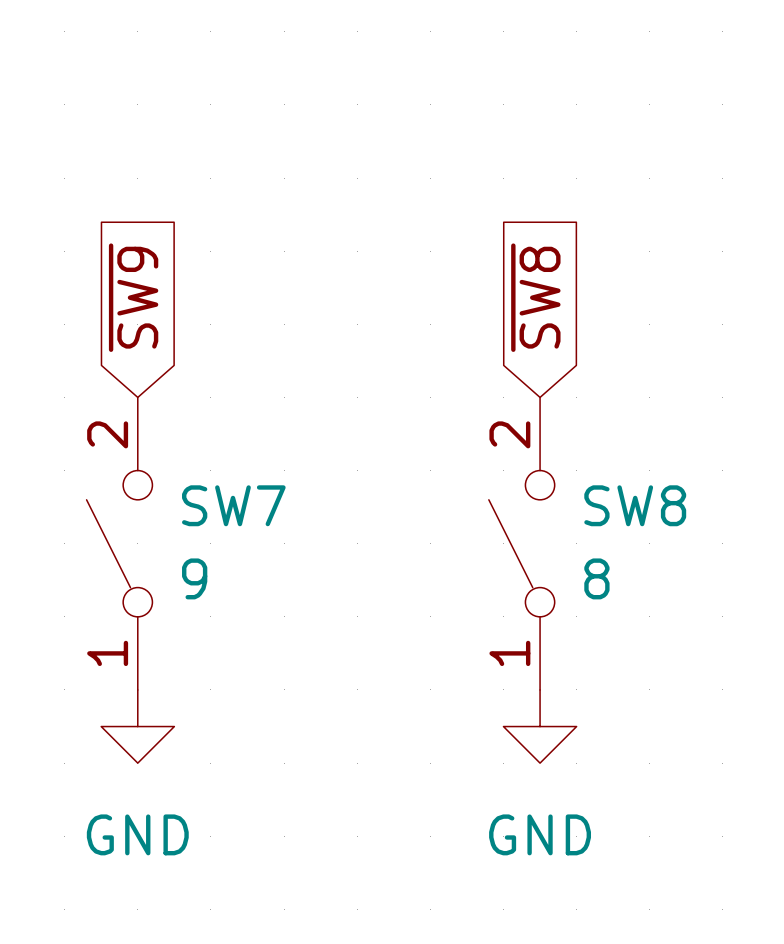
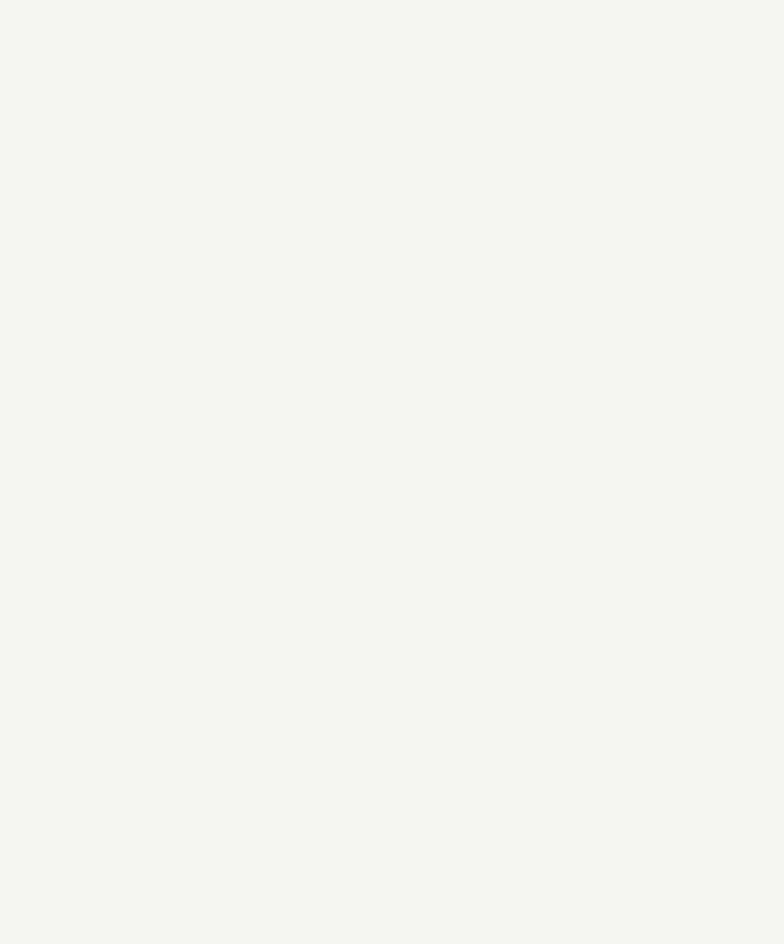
global label: ~{SW9} (133, 297) -> none
global label: ~{SW8} (535, 297) -> none
SW7: 9 (119, 543) -> none
SW8: 8 (521, 543) -> none
power symbol: GND (137, 726) -> none
power symbol: GND (540, 726) -> none

